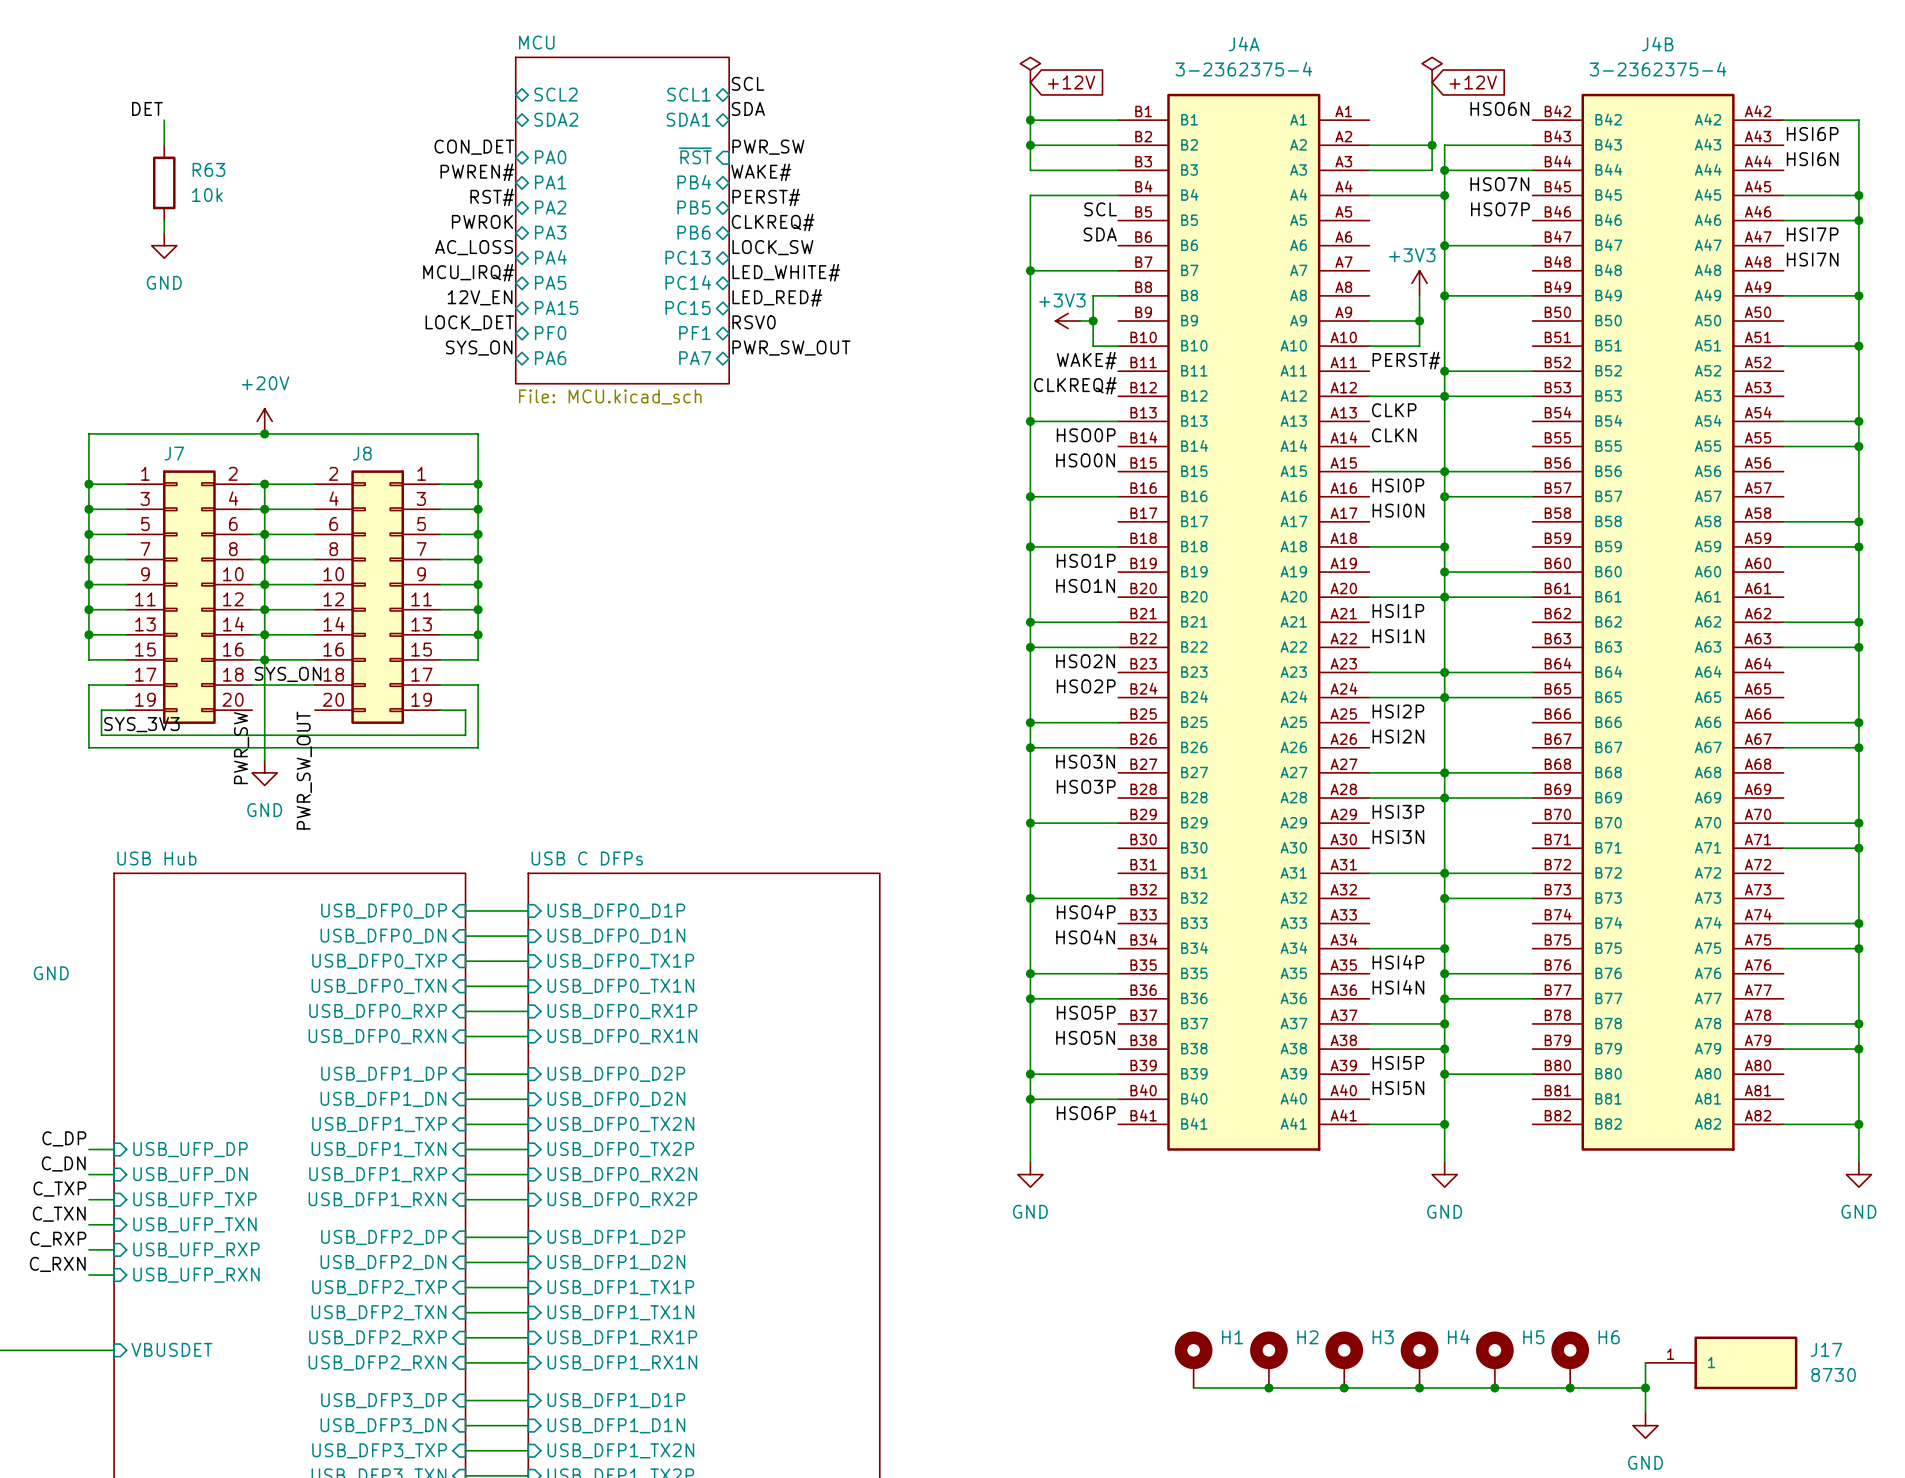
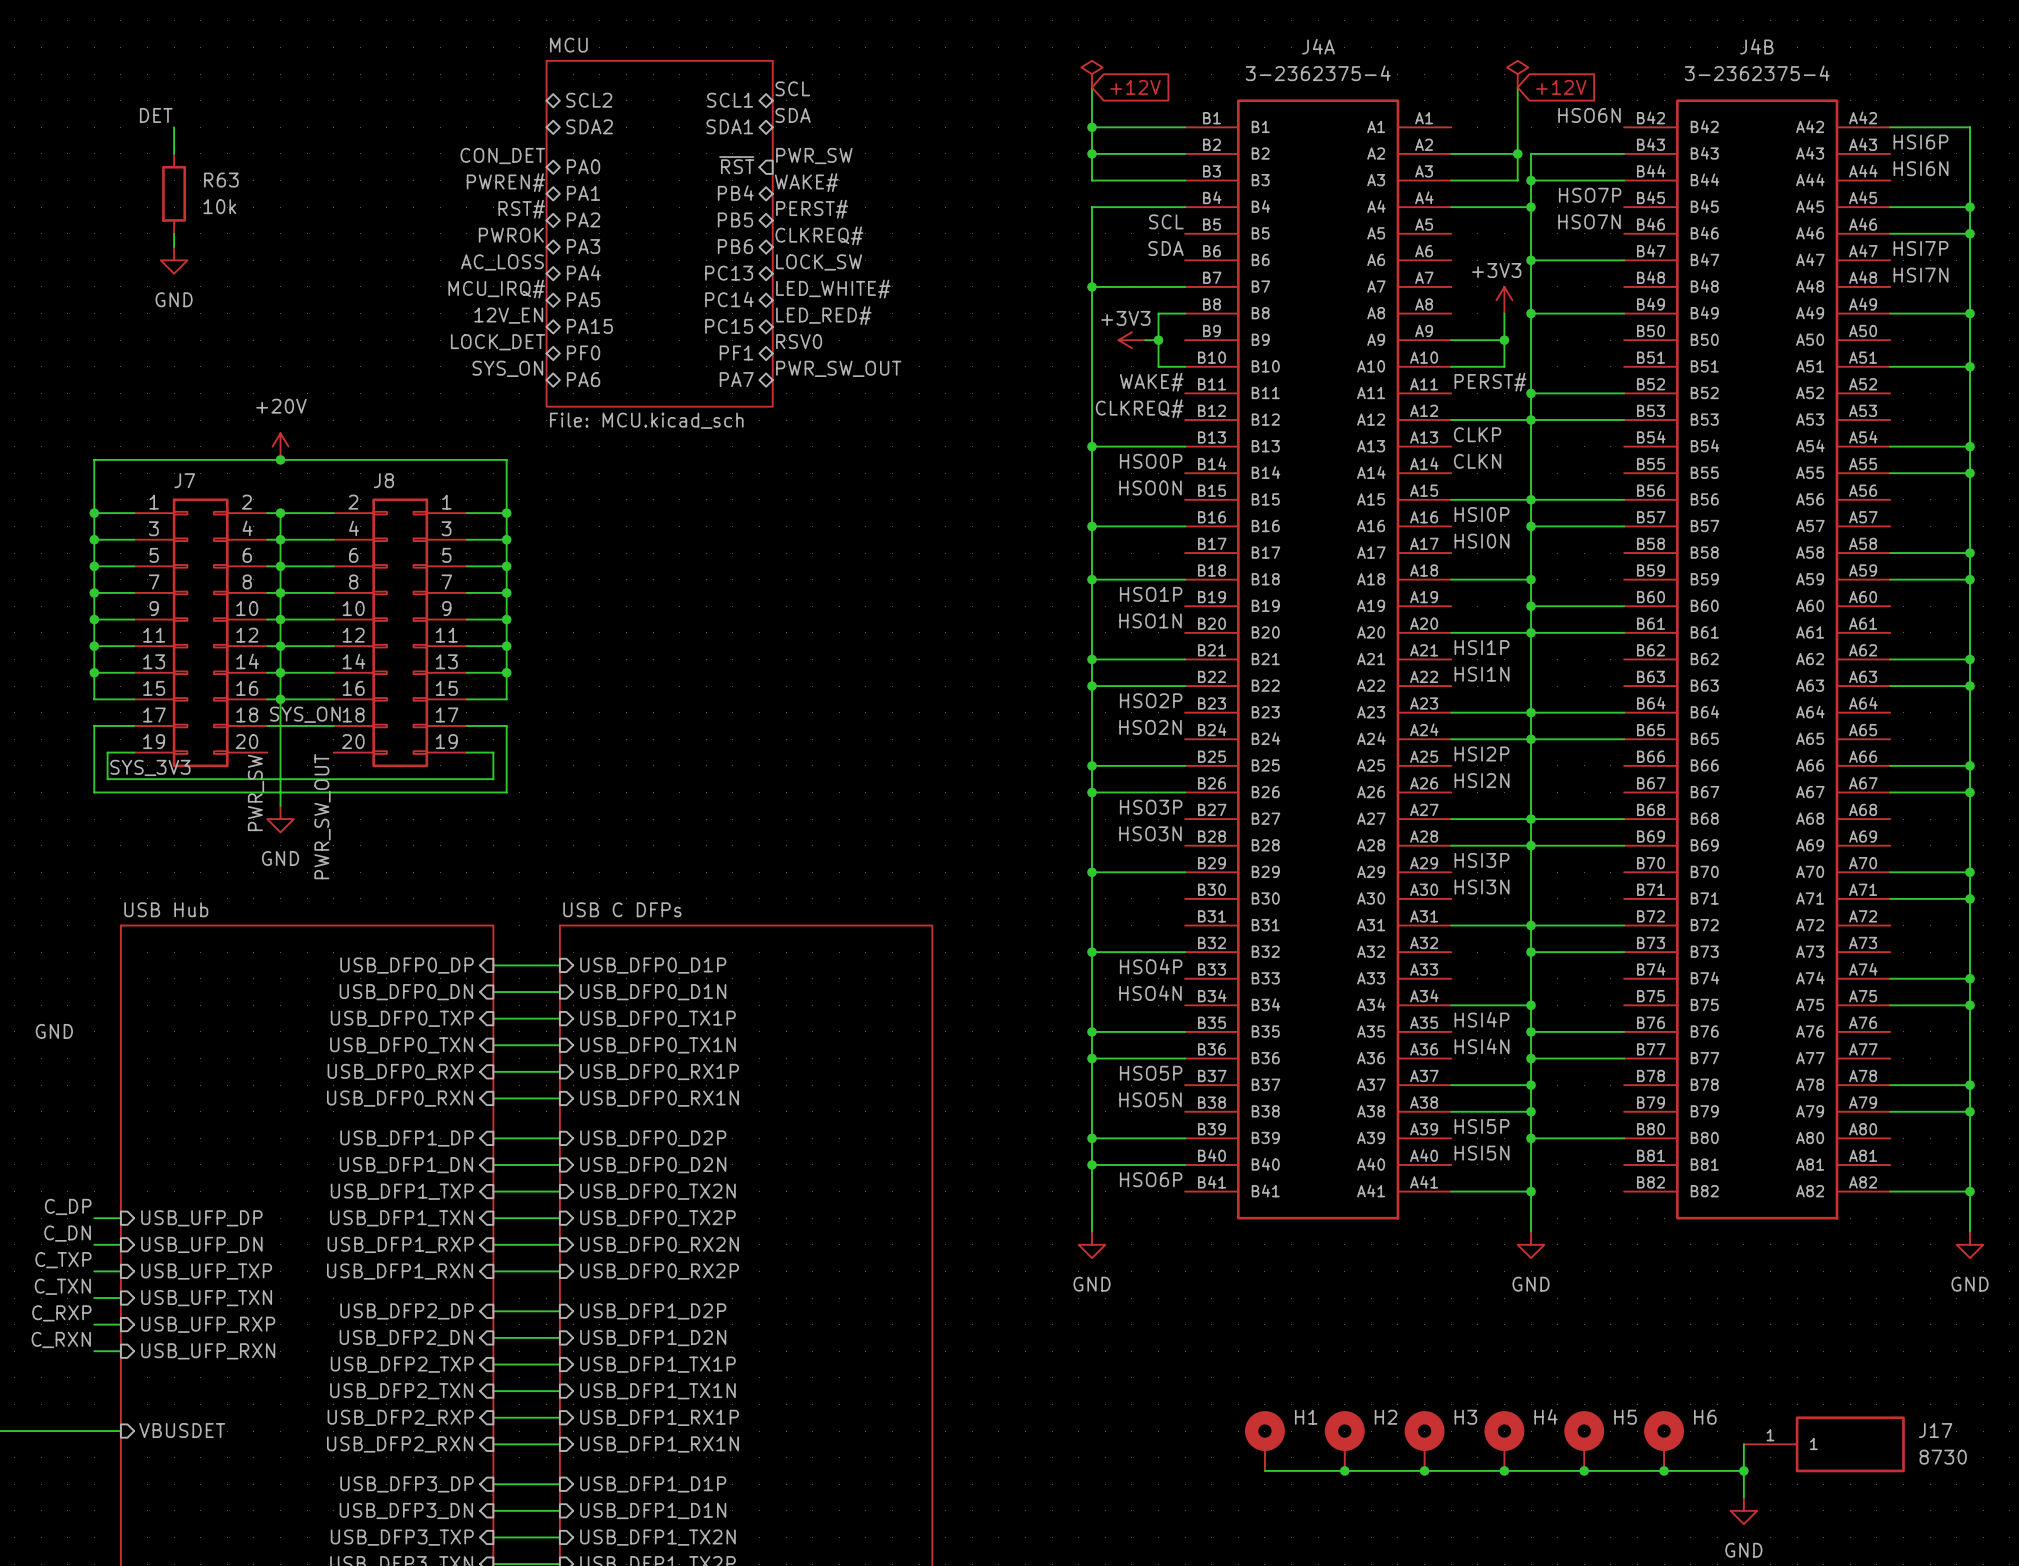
label: HSO7N (1499, 184) -> HSO7P (1590, 195)
label: HSO7P (1500, 209) -> HSO7N (1589, 221)
label: HSO2N (1085, 661) -> HSO2P (1151, 700)
label: HSO2P (1086, 686) -> HSO2N (1150, 727)
label: HSO3N (1085, 761) -> HSO3P (1151, 807)
label: HSO3P (1086, 786) -> HSO3N (1150, 833)

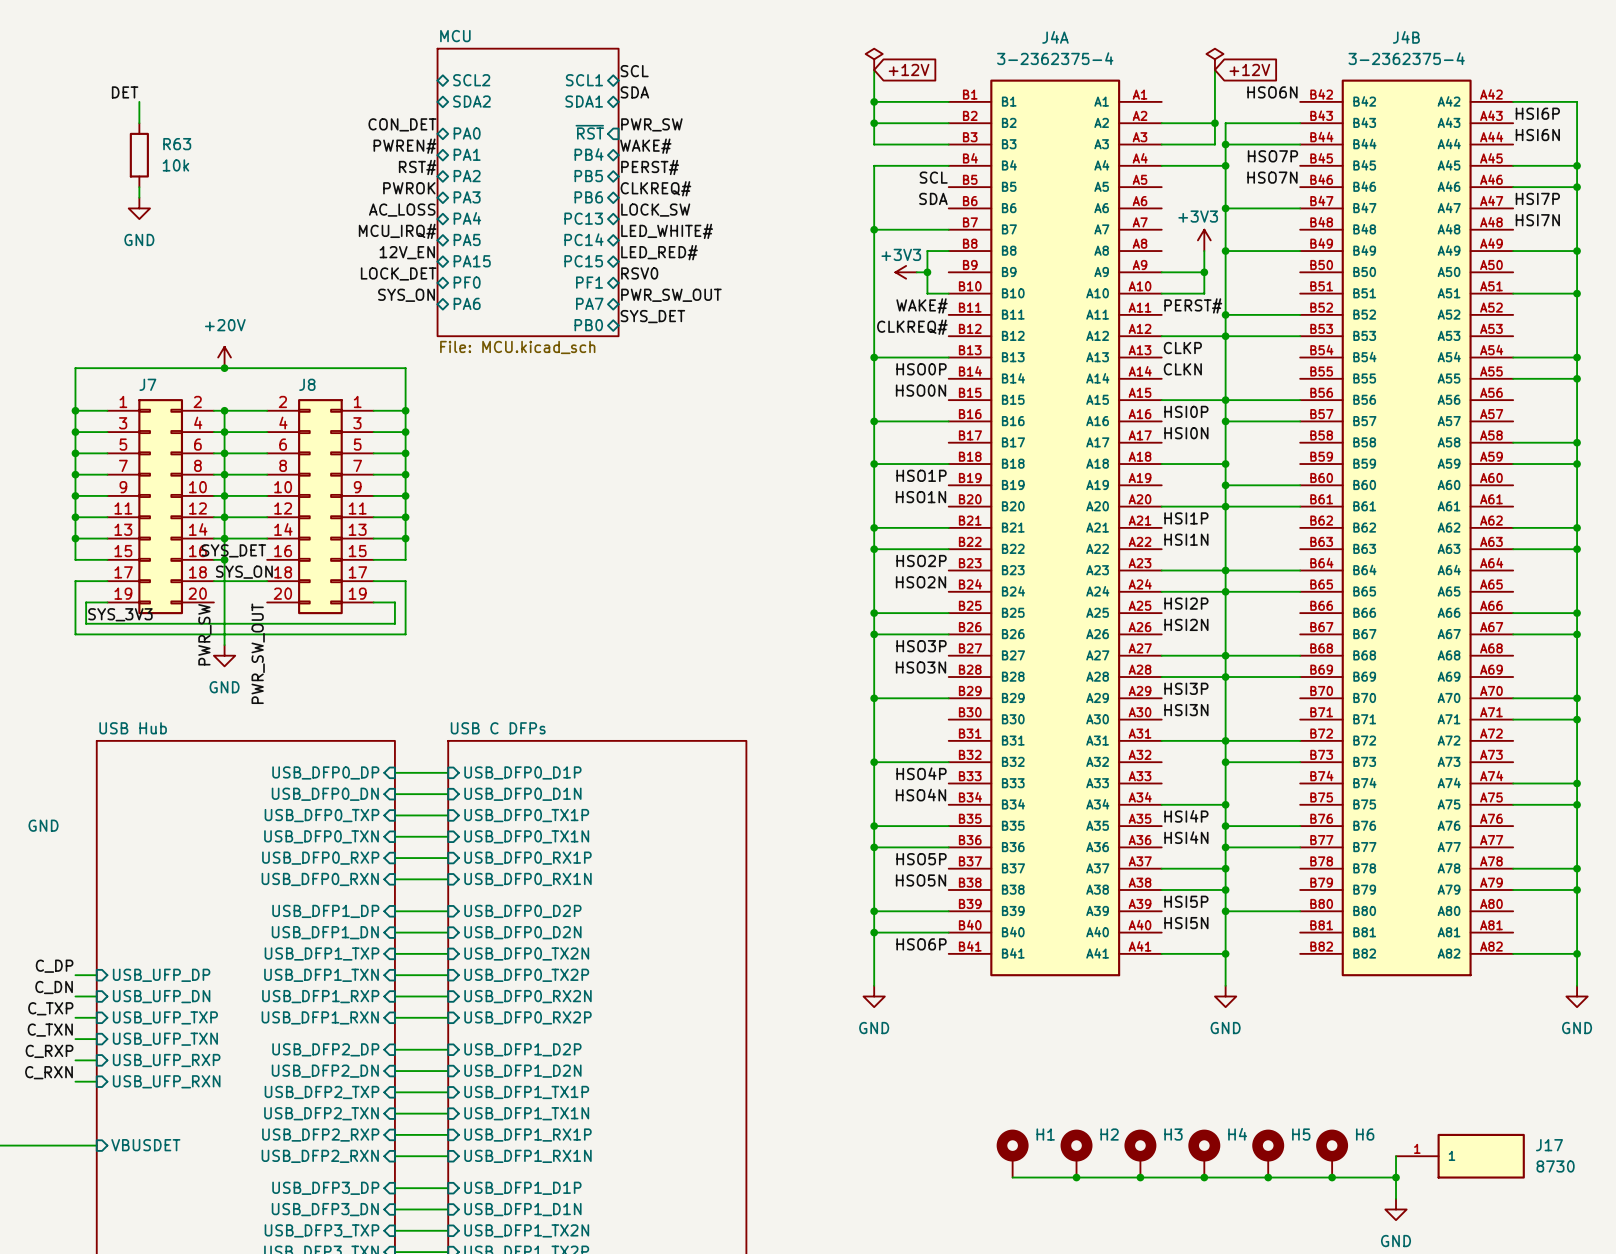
sheet MCU shape: [545, 60, 774, 408] -> [436, 48, 620, 337]
label: none -> SYS_DET (652, 316)
sheet pin: none -> PB0 (588, 325)
label: none -> SYS_DET (233, 550)
wire: (280, 699) (333, 699) -> none

